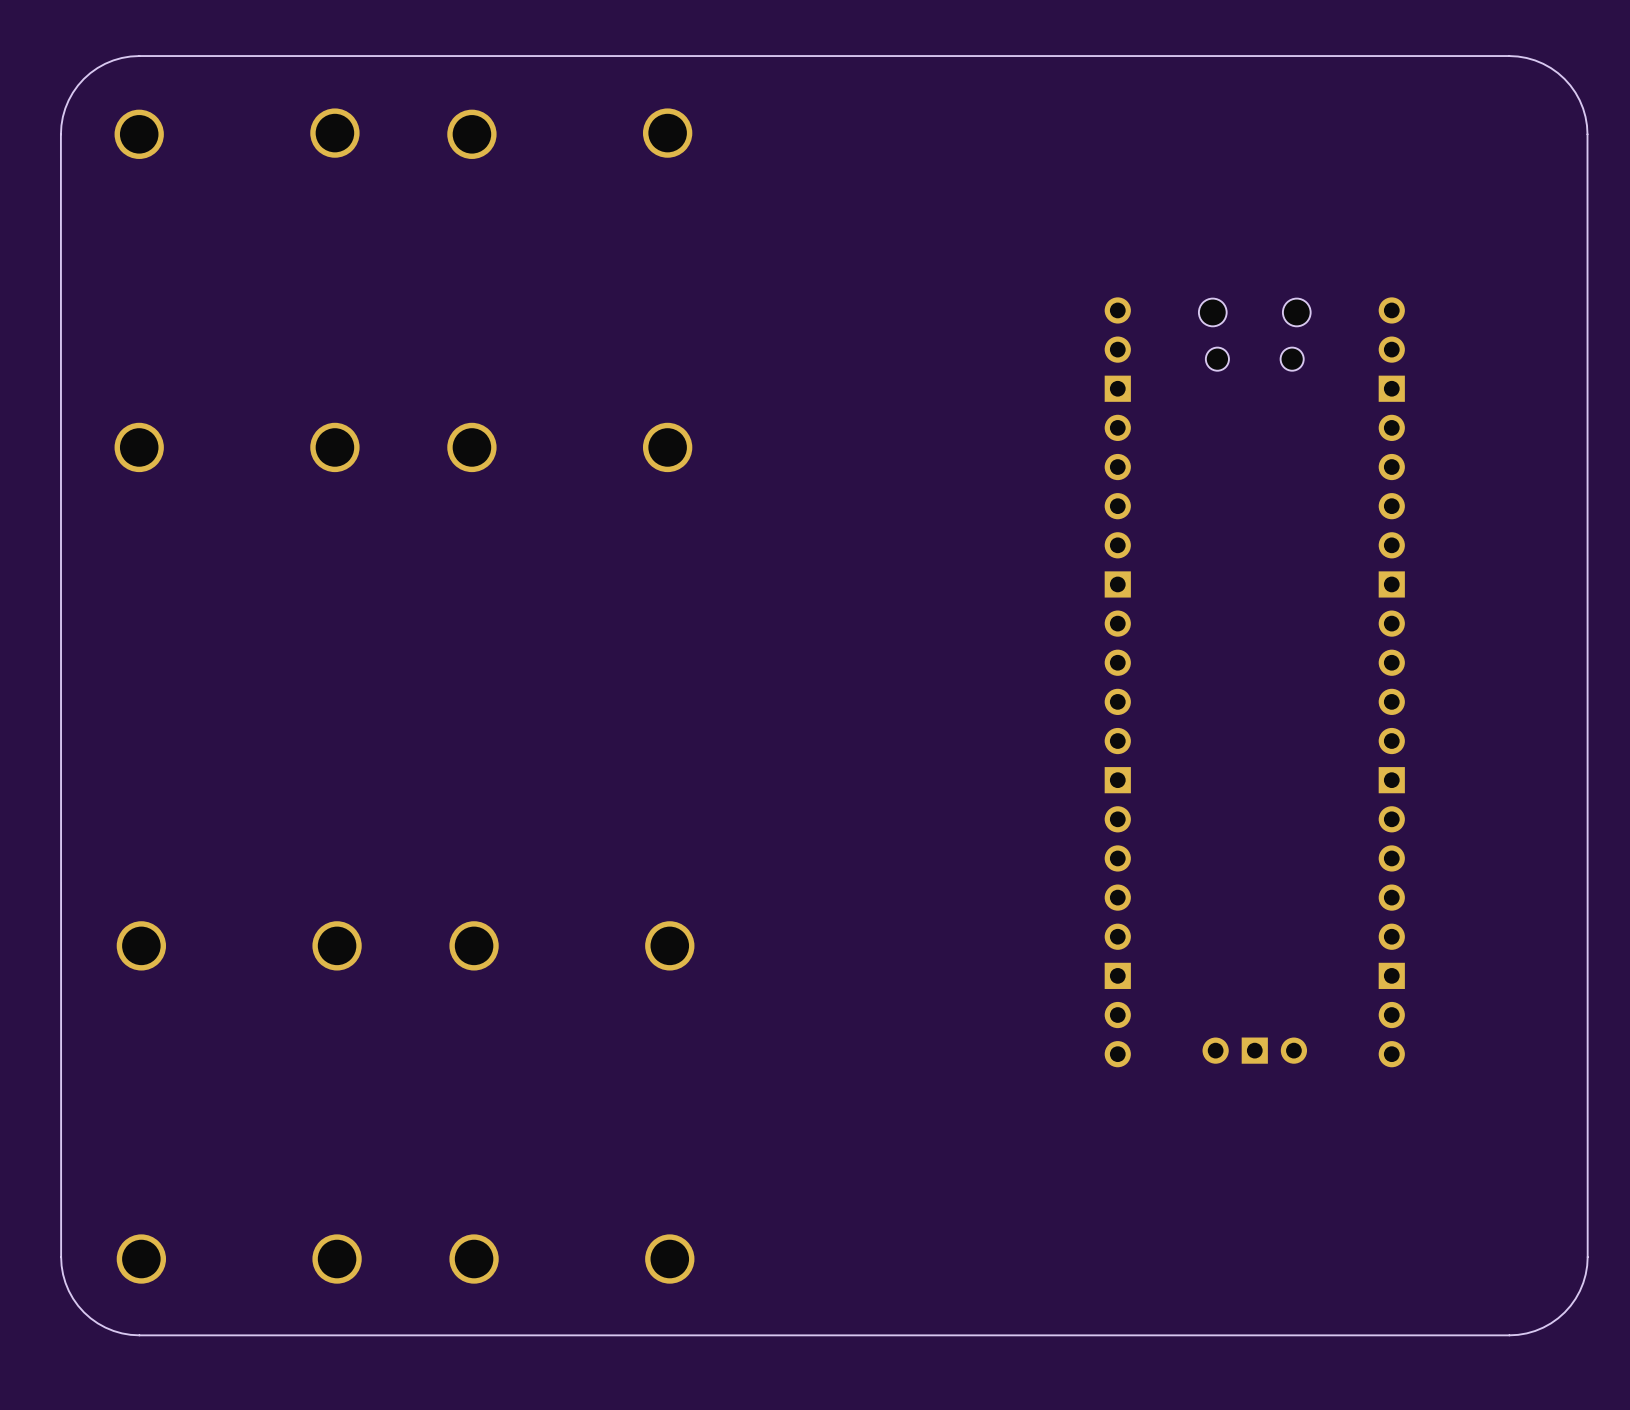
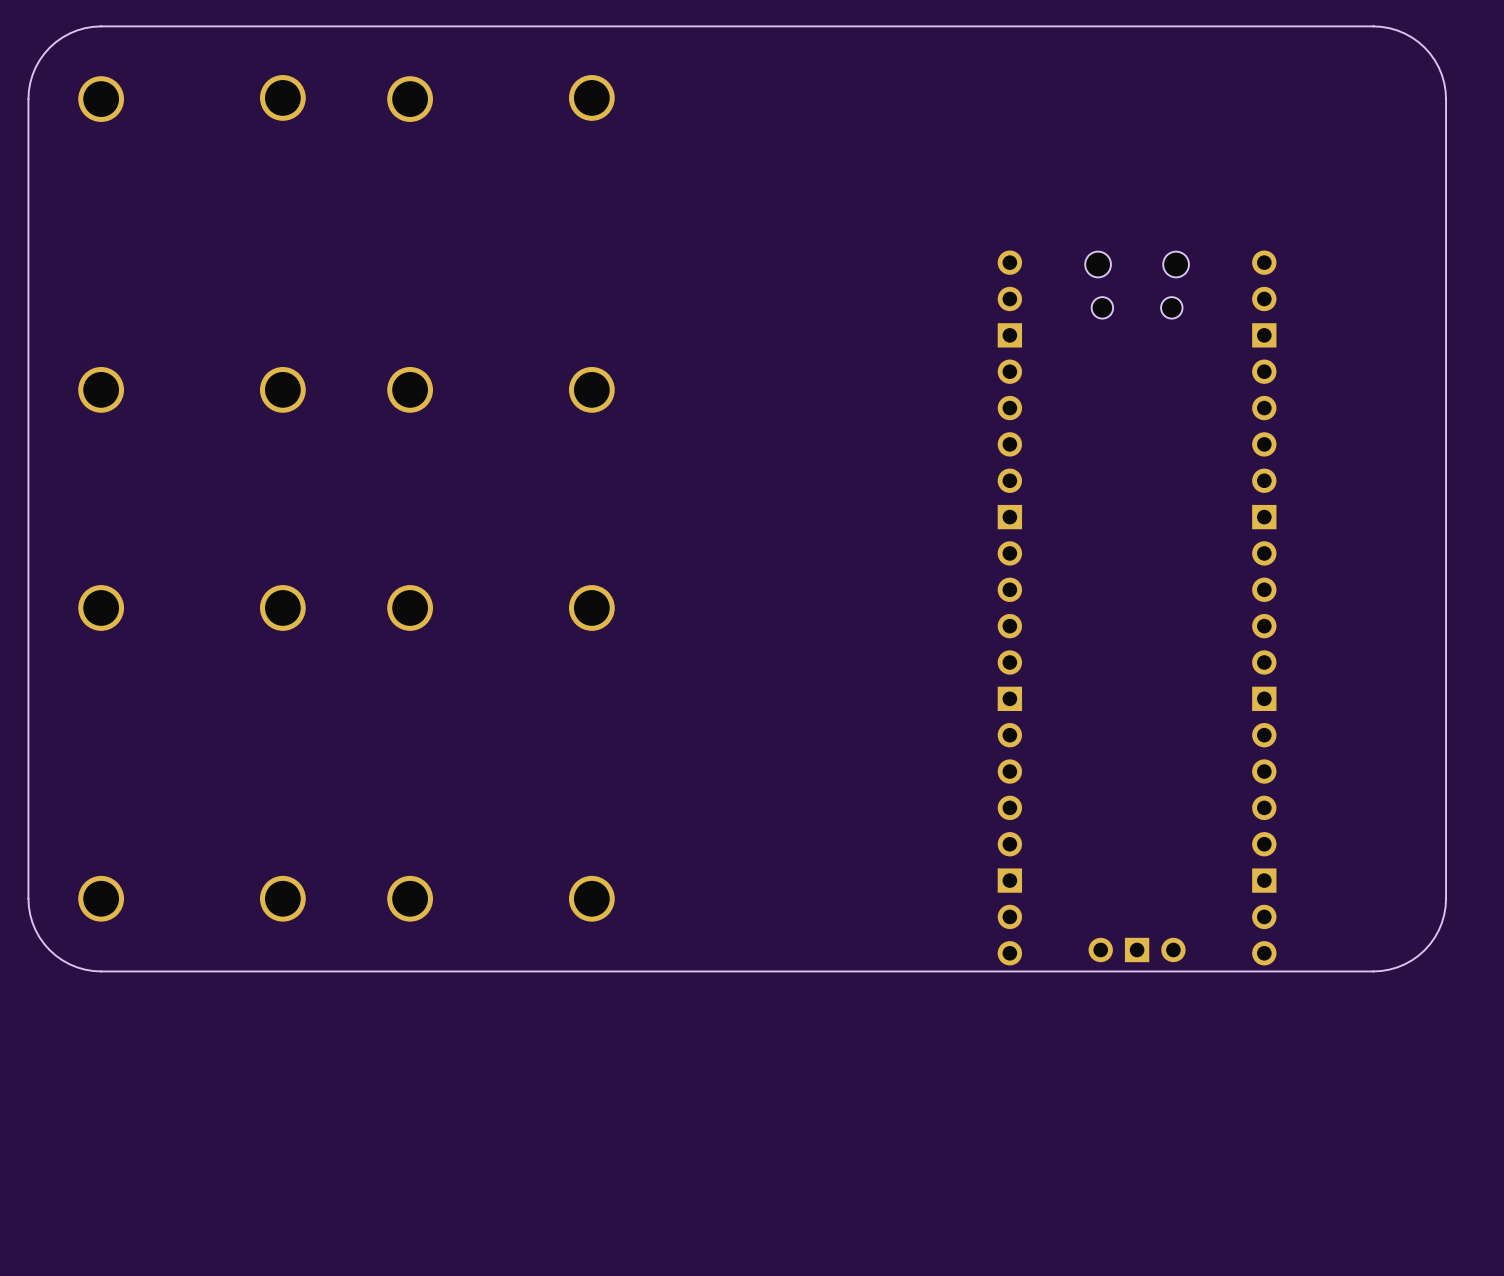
board edge: (1587, 134) (1587, 1265) (1579, 1291) (1570, 1305) (1558, 1318) (1535, 1330) (1509, 1335) (139, 1335) (113, 1330) (90, 1318) (78, 1305) (68, 1291) (63, 1274) (61, 1257) (60, 134) -> (1446, 99) (1445, 906) (1438, 930) (1424, 950) (1412, 960) (1397, 967) (1373, 971) (101, 971) (84, 969) (62, 960) (49, 950) (39, 937) (30, 914) (28, 898) (28, 99)
part: none -> (101, 607)
part: none -> (282, 607)
part: none -> (410, 607)
part: none -> (591, 607)
part position: (141, 945) -> (101, 898)
part position: (337, 945) -> (282, 898)
part position: (474, 945) -> (410, 898)
part position: (669, 945) -> (591, 898)
part: (141, 1259) -> none
part: (337, 1259) -> none
part: (474, 1259) -> none
part: (669, 1259) -> none

